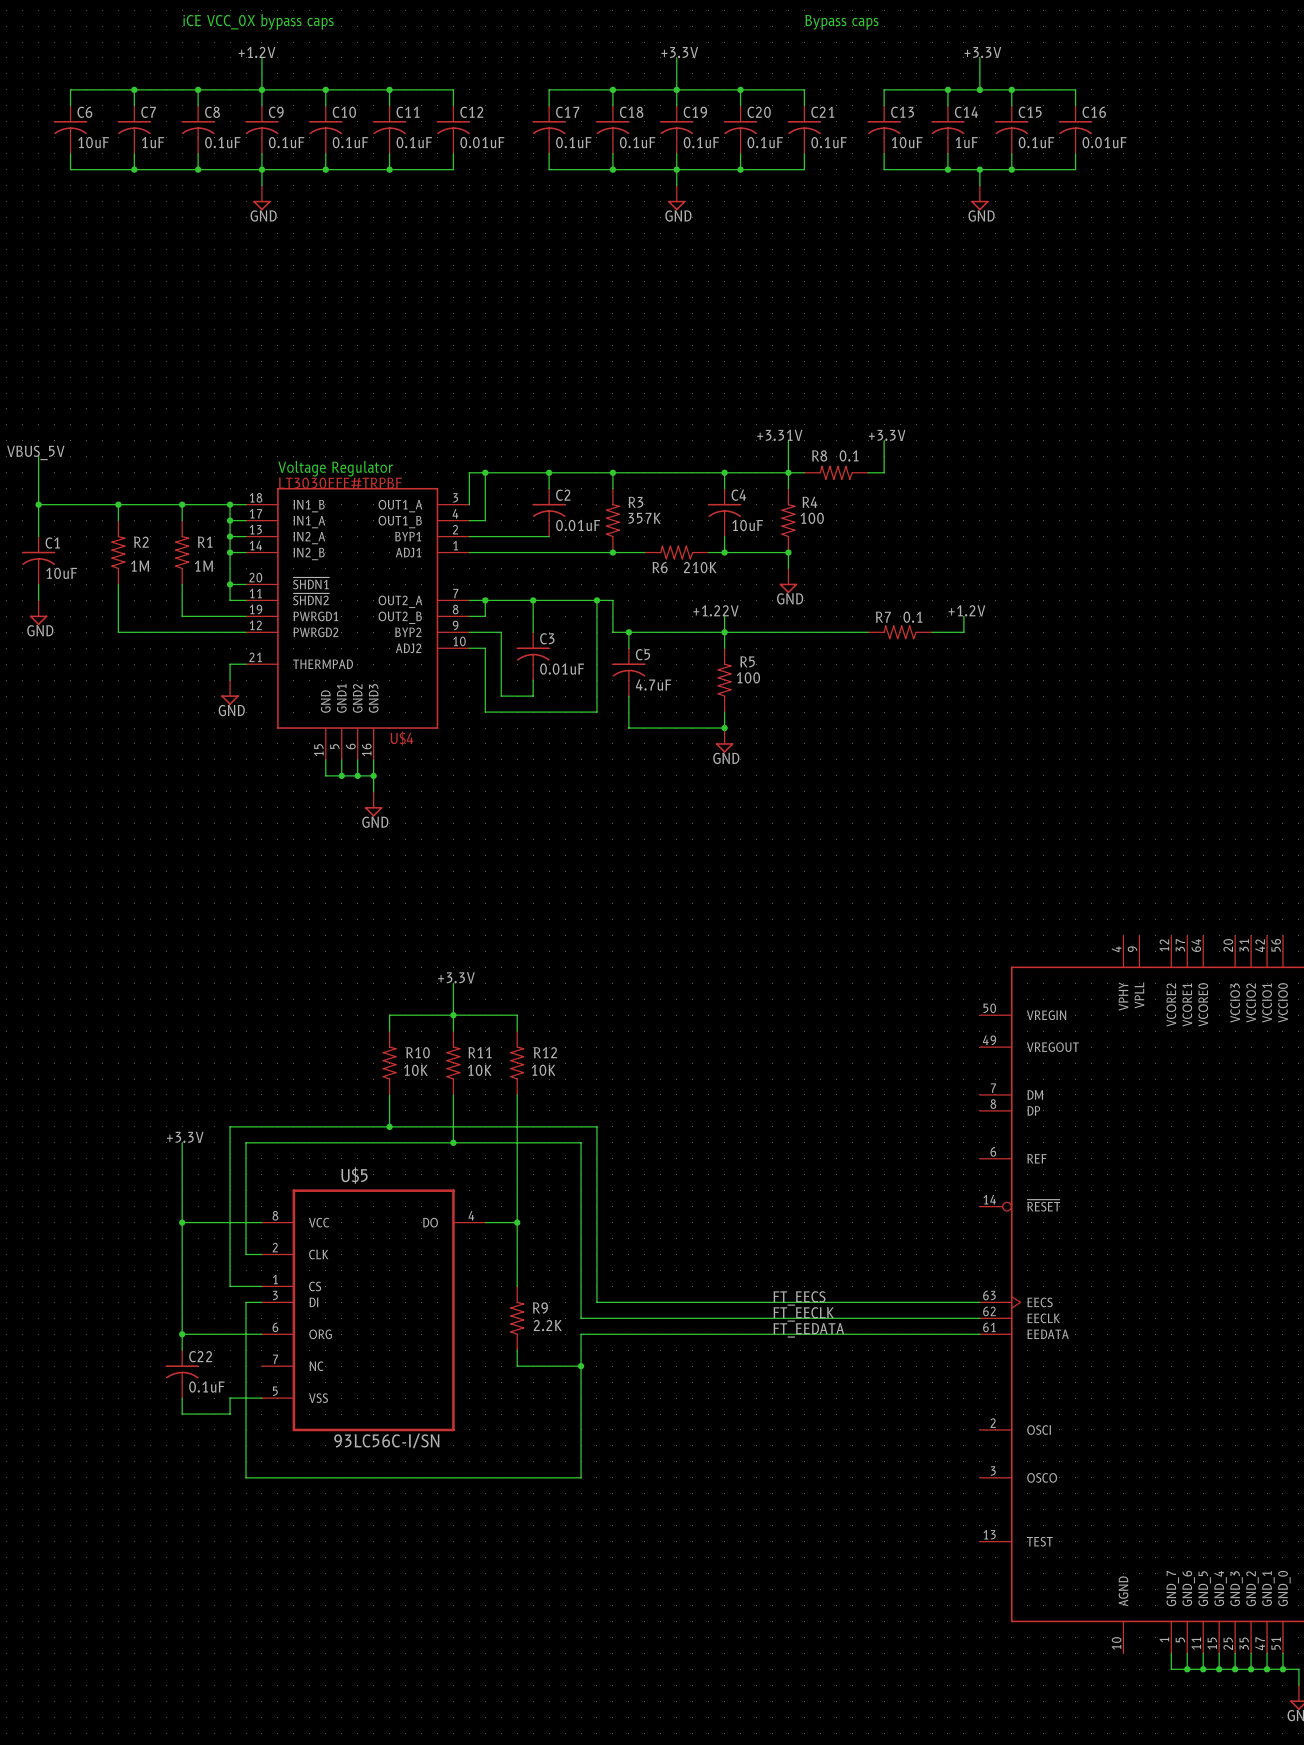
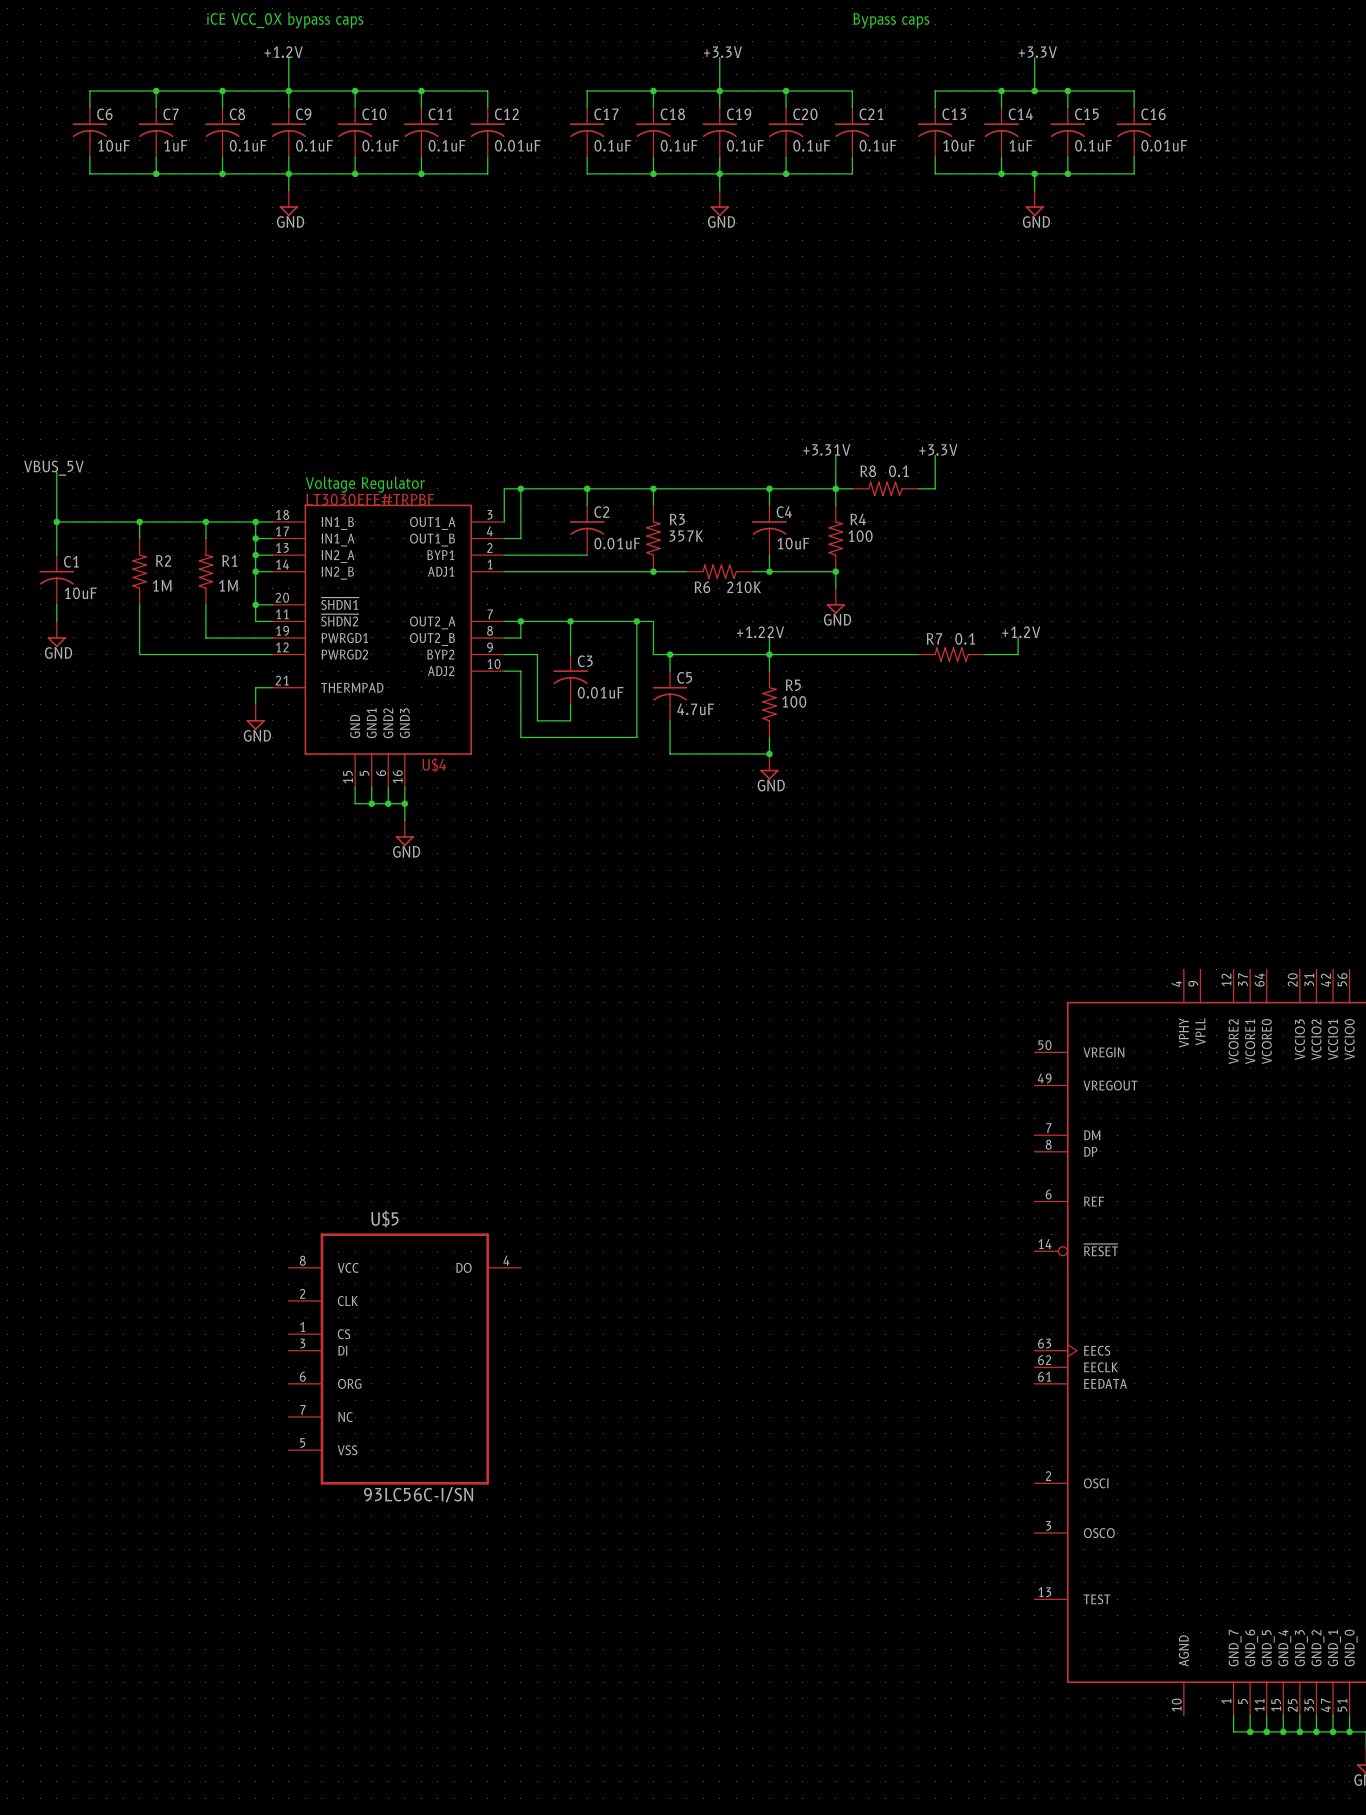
label: +3.3V (456, 977) -> none
wire: (453, 983) (453, 1031) -> none
junction: (453, 1015) -> none
wire: (389, 1031) (389, 1015) (517, 1015) (517, 1031) -> none
R10: 10K (389, 1063) -> none
R11: 10K (453, 1063) -> none
R12: 10K (517, 1063) -> none
wire: (389, 1094) (389, 1126) -> none
wire: (453, 1094) (453, 1142) -> none
wire: (517, 1094) (517, 1286) -> none
junction: (389, 1126) -> none
label: +3.3V (185, 1137) -> none
wire: (182, 1142) (182, 1350) -> none
junction: (453, 1142) -> none
wire: (182, 1222) (261, 1222) -> none
junction: (182, 1222) -> none
wire: (485, 1222) (517, 1222) -> none
junction: (517, 1222) -> none
wire: (261, 1254) (246, 1254) (246, 1142) (581, 1142) (581, 1318) (979, 1318) -> none
wire: (261, 1286) (230, 1286) (230, 1126) (596, 1126) (596, 1302) (979, 1302) -> none
label: FT_EECS (799, 1298) -> none
wire: (261, 1302) (246, 1302) (246, 1477) (581, 1477) (581, 1334) (979, 1334) -> none
label: FT_EECLK (803, 1314) -> none
R9: 2.2K (517, 1318) -> none
label: FT_EEDATA (808, 1330) -> none
wire: (182, 1334) (261, 1334) -> none
junction: (182, 1334) -> none
wire: (517, 1350) (517, 1366) (581, 1366) -> none
junction: (581, 1366) -> none
C22: 0.1uF (182, 1374) -> none
wire: (182, 1398) (182, 1414) (230, 1414) (230, 1398) (261, 1398) -> none

